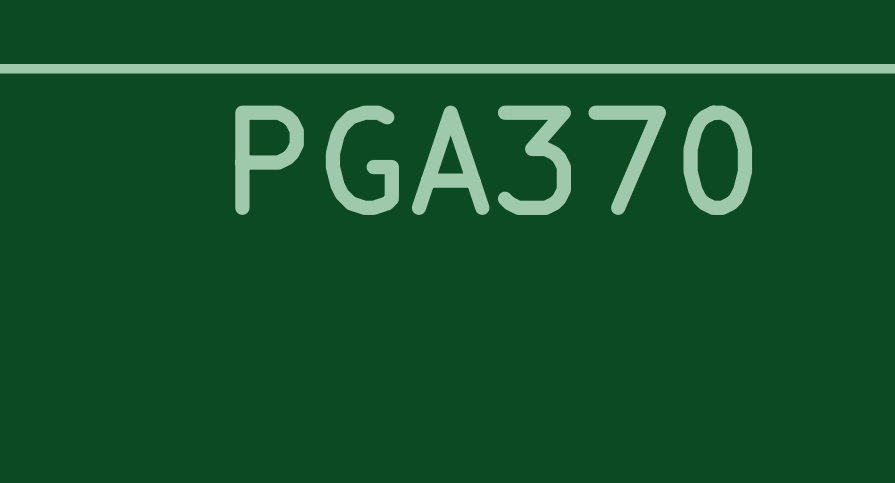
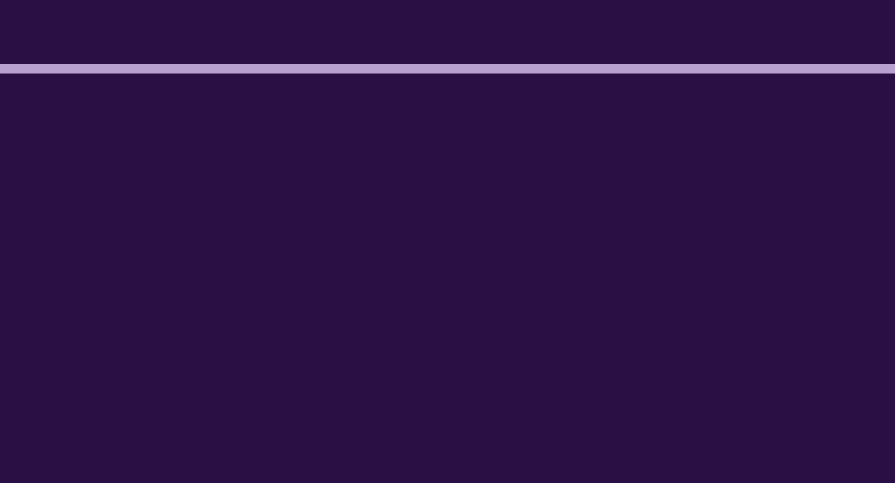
part value: PGA370 (493, 160) -> none

